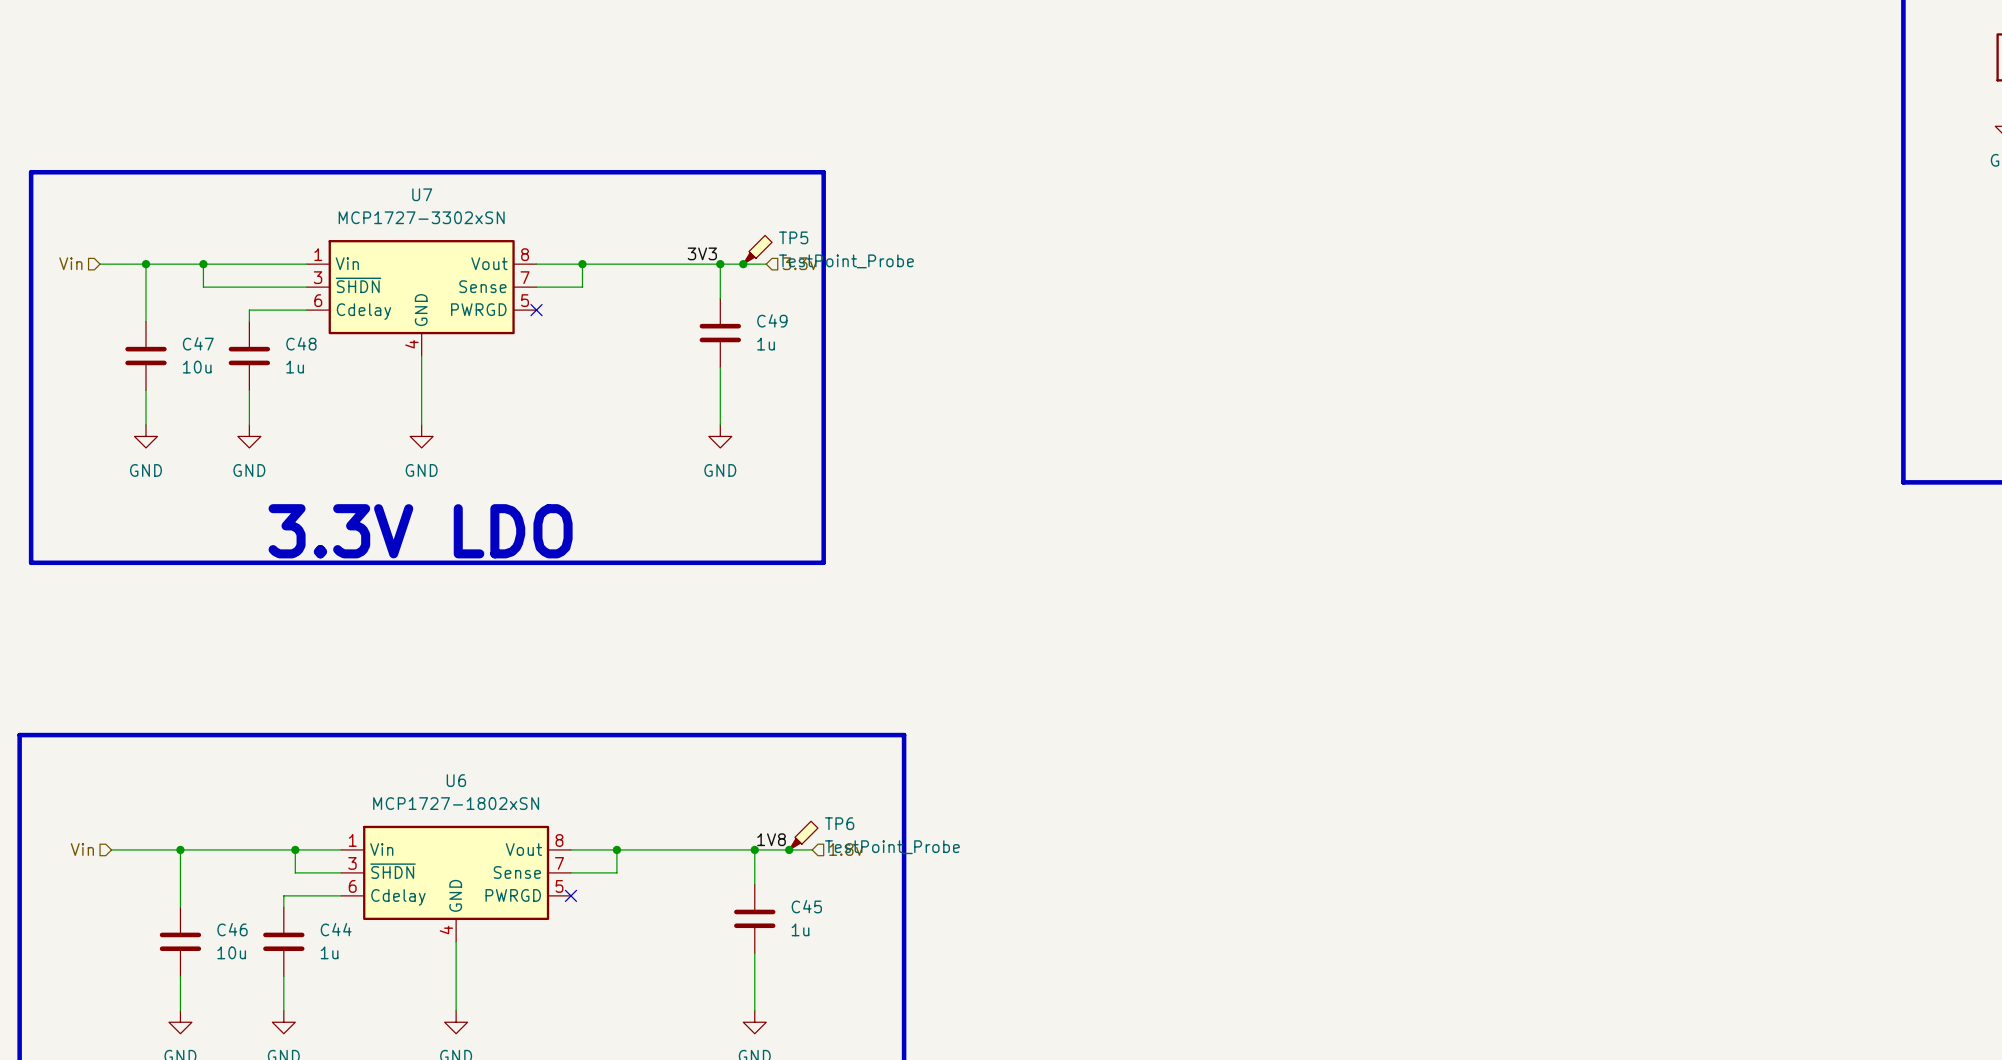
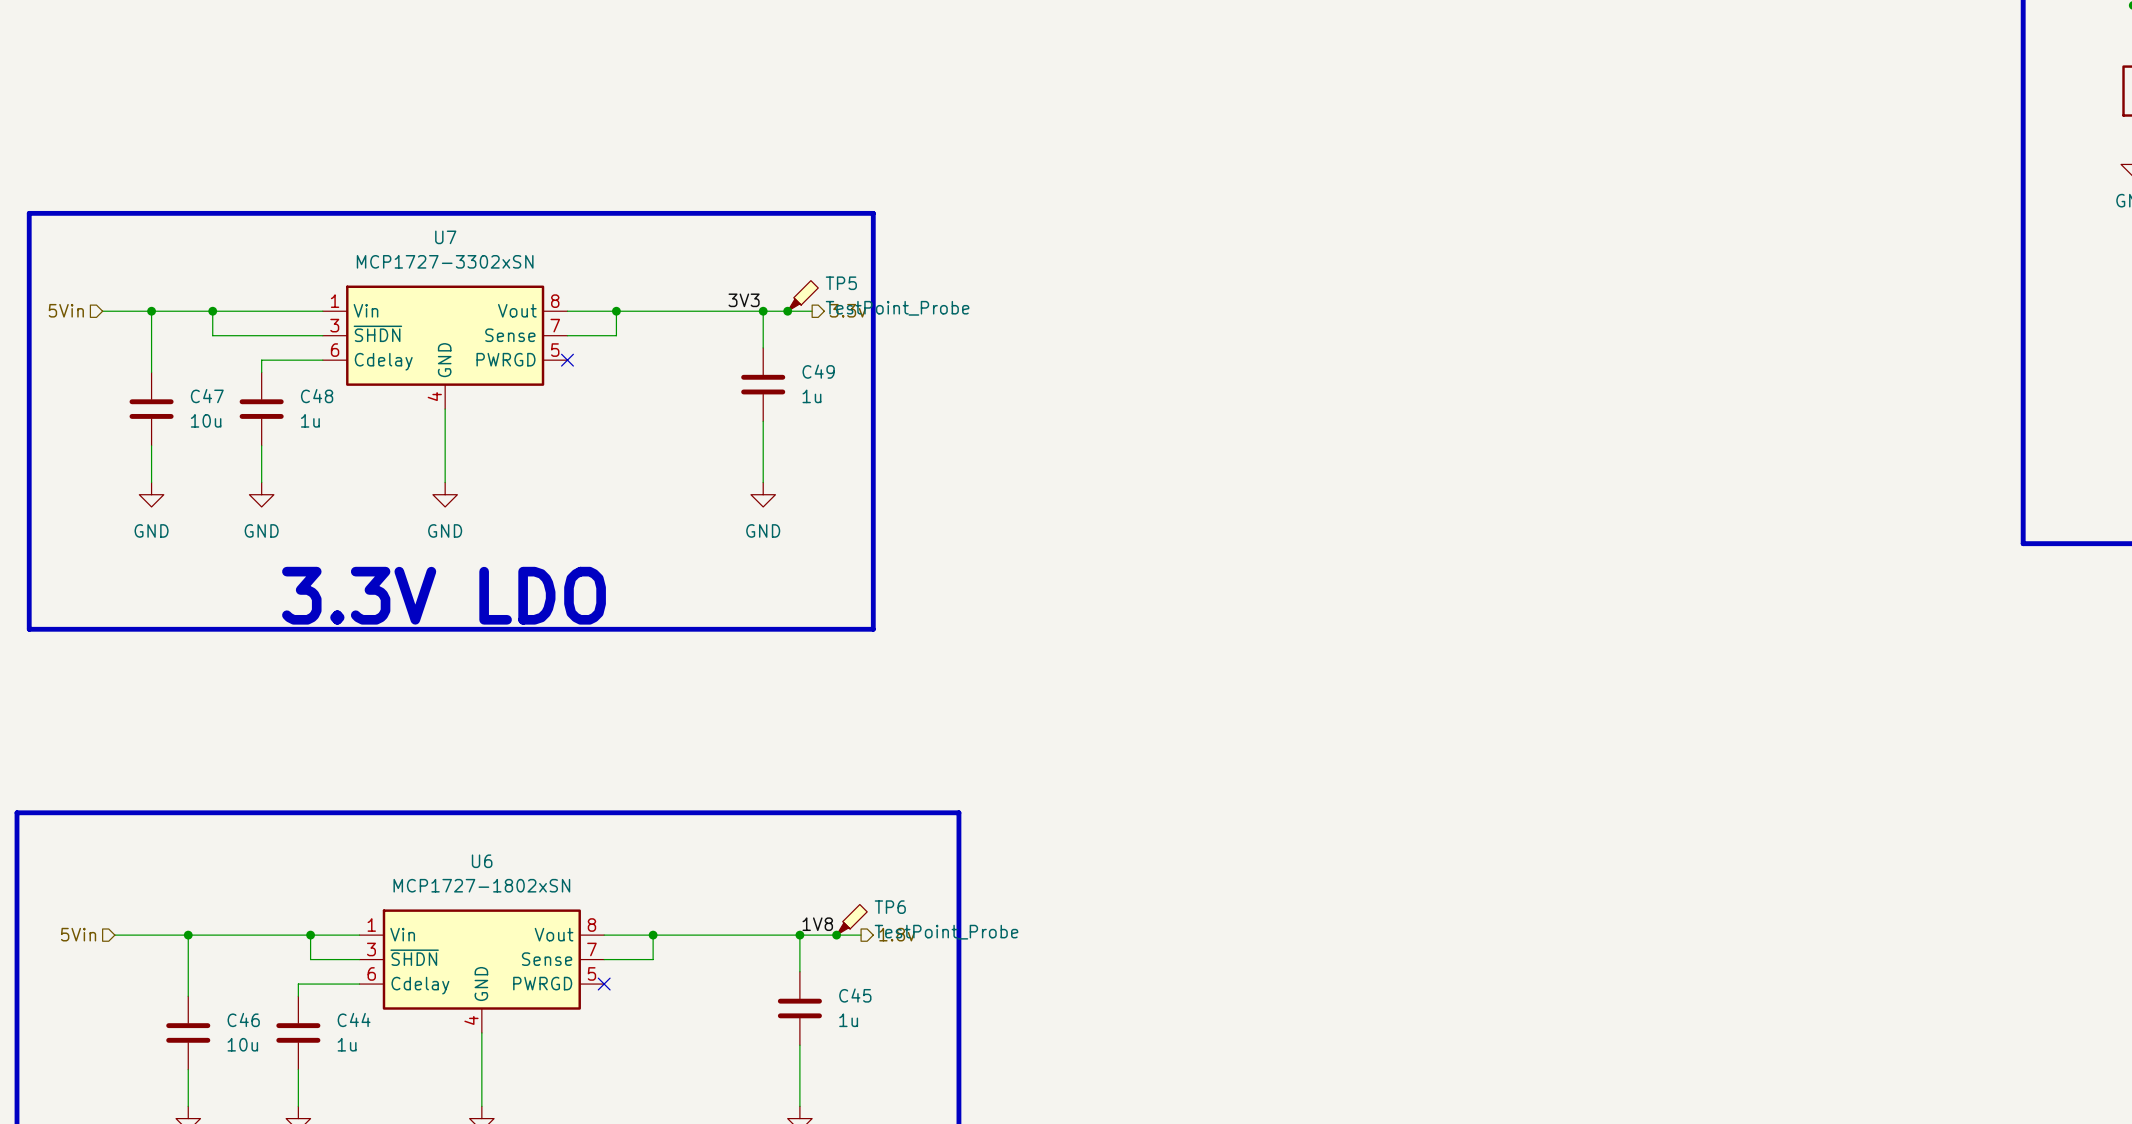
hierarchical label: Vin (70, 263) -> 5Vin (66, 310)
hierarchical label shape: input (799, 263) -> output (847, 310)
hierarchical label: Vin (82, 849) -> 5Vin (78, 934)
hierarchical label shape: input (846, 849) -> output (897, 934)

